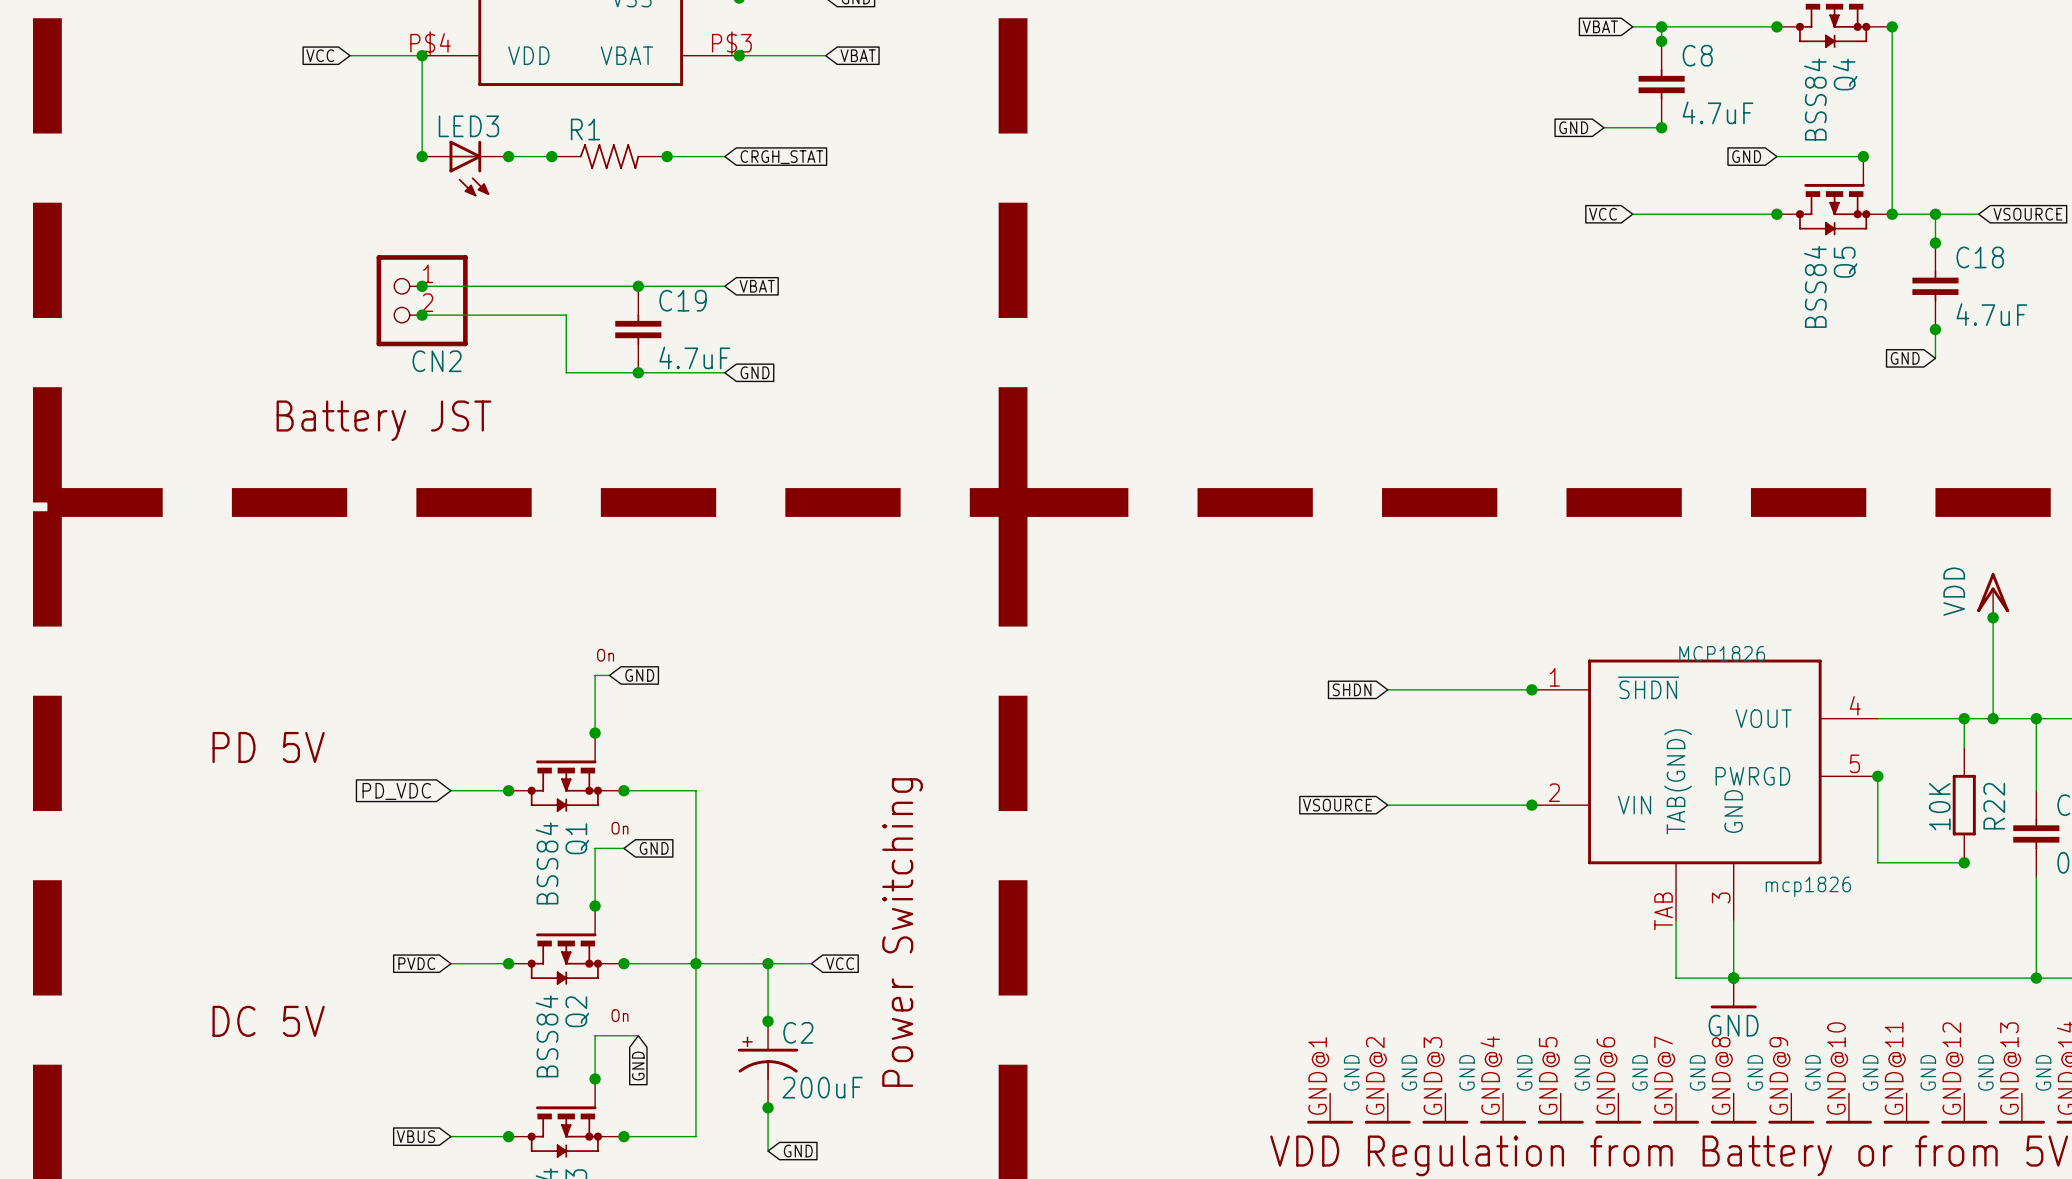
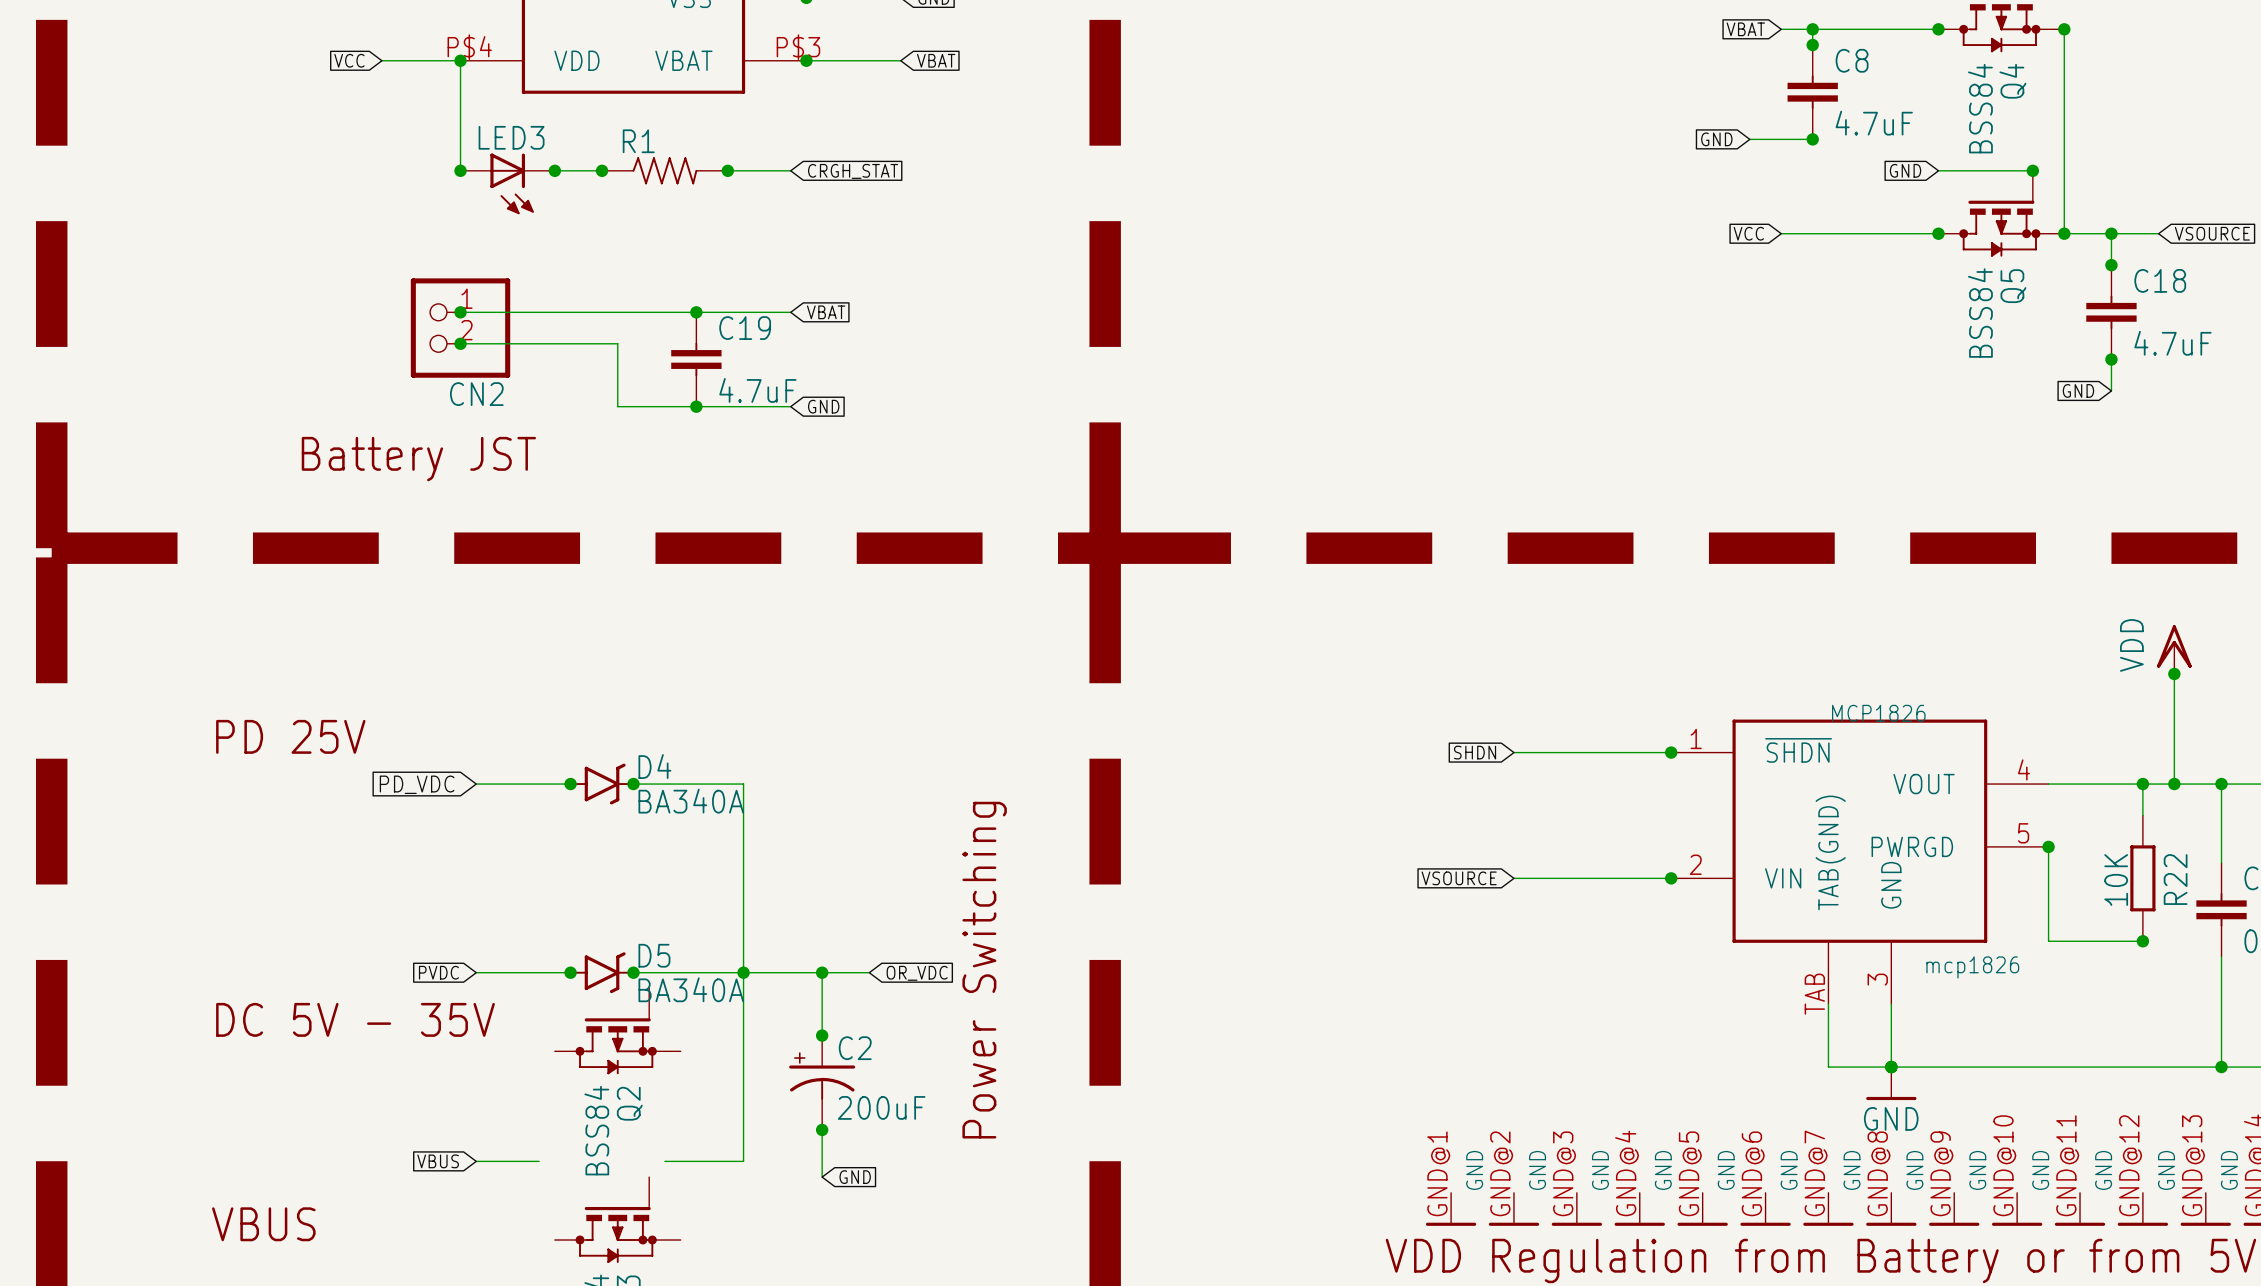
text: On (605, 655) -> none
text: none -> PD 25V (290, 736)
wire: (609, 675) (595, 675) (595, 733) -> none
global label: GND (639, 675) -> none
wire: none -> (476, 784) (570, 784)
junction: none -> (570, 784)
D4: none -> BA340A (602, 784)
wire: none -> (633, 784) (743, 784) (743, 1161) (664, 1161)
junction position: (595, 733) -> (633, 784)
text: PD 5V (268, 747) -> none
Q1: BSS84 (566, 772) -> none
wire: (450, 790) (508, 790) -> none
junction: (508, 790) -> none
wire: (623, 790) (695, 790) (695, 1136) (623, 1136) -> none
junction: (623, 790) -> none
global label position: PD_VDC (396, 791) -> PD_VDC (417, 784)
text: On (619, 828) -> none
wire: (623, 848) (595, 848) (595, 906) -> none
global label: GND (654, 848) -> none
wire: none -> (476, 972) (570, 972)
junction: none -> (570, 972)
D5: none -> BA340A (602, 972)
wire: none -> (633, 972) (869, 972)
junction: none -> (743, 972)
junction: none -> (822, 972)
global label: none -> OR_VDC (917, 973)
junction position: (595, 906) -> (633, 972)
text position: Power Switching (902, 932) -> Power Switching (984, 970)
text: none -> DC 5V - 35V (355, 1019)
global label position: PVDC (416, 963) -> PVDC (438, 972)
wire: (450, 963) (508, 963) -> none
junction: (508, 963) -> none
wire: (623, 963) (811, 963) -> none
junction: (623, 963) -> none
junction: (695, 963) -> none
wire: (768, 963) (768, 1021) -> (822, 972) (822, 1035)
junction position: (768, 963) -> (822, 1035)
global label: VCC (840, 963) -> none
text: On (619, 1015) -> none
text: DC 5V (268, 1021) -> none
junction position: (768, 1021) -> (822, 1129)
wire: (638, 1035) (595, 1035) (595, 1078) -> none
C2 position: (768, 1064) -> (822, 1082)
global label: GND (638, 1066) -> none
junction: (595, 1078) -> none
global label: none -> GND (855, 1177)
wire: (768, 1107) (768, 1151) -> (822, 1129) (822, 1177)
junction: (768, 1107) -> none
text: none -> VBUS (263, 1224)
global label position: VBUS (416, 1136) -> VBUS (438, 1161)
wire: (450, 1136) (508, 1136) -> (476, 1161) (539, 1161)
junction: (508, 1136) -> none
junction: (623, 1136) -> none
global label: GND (798, 1151) -> none

